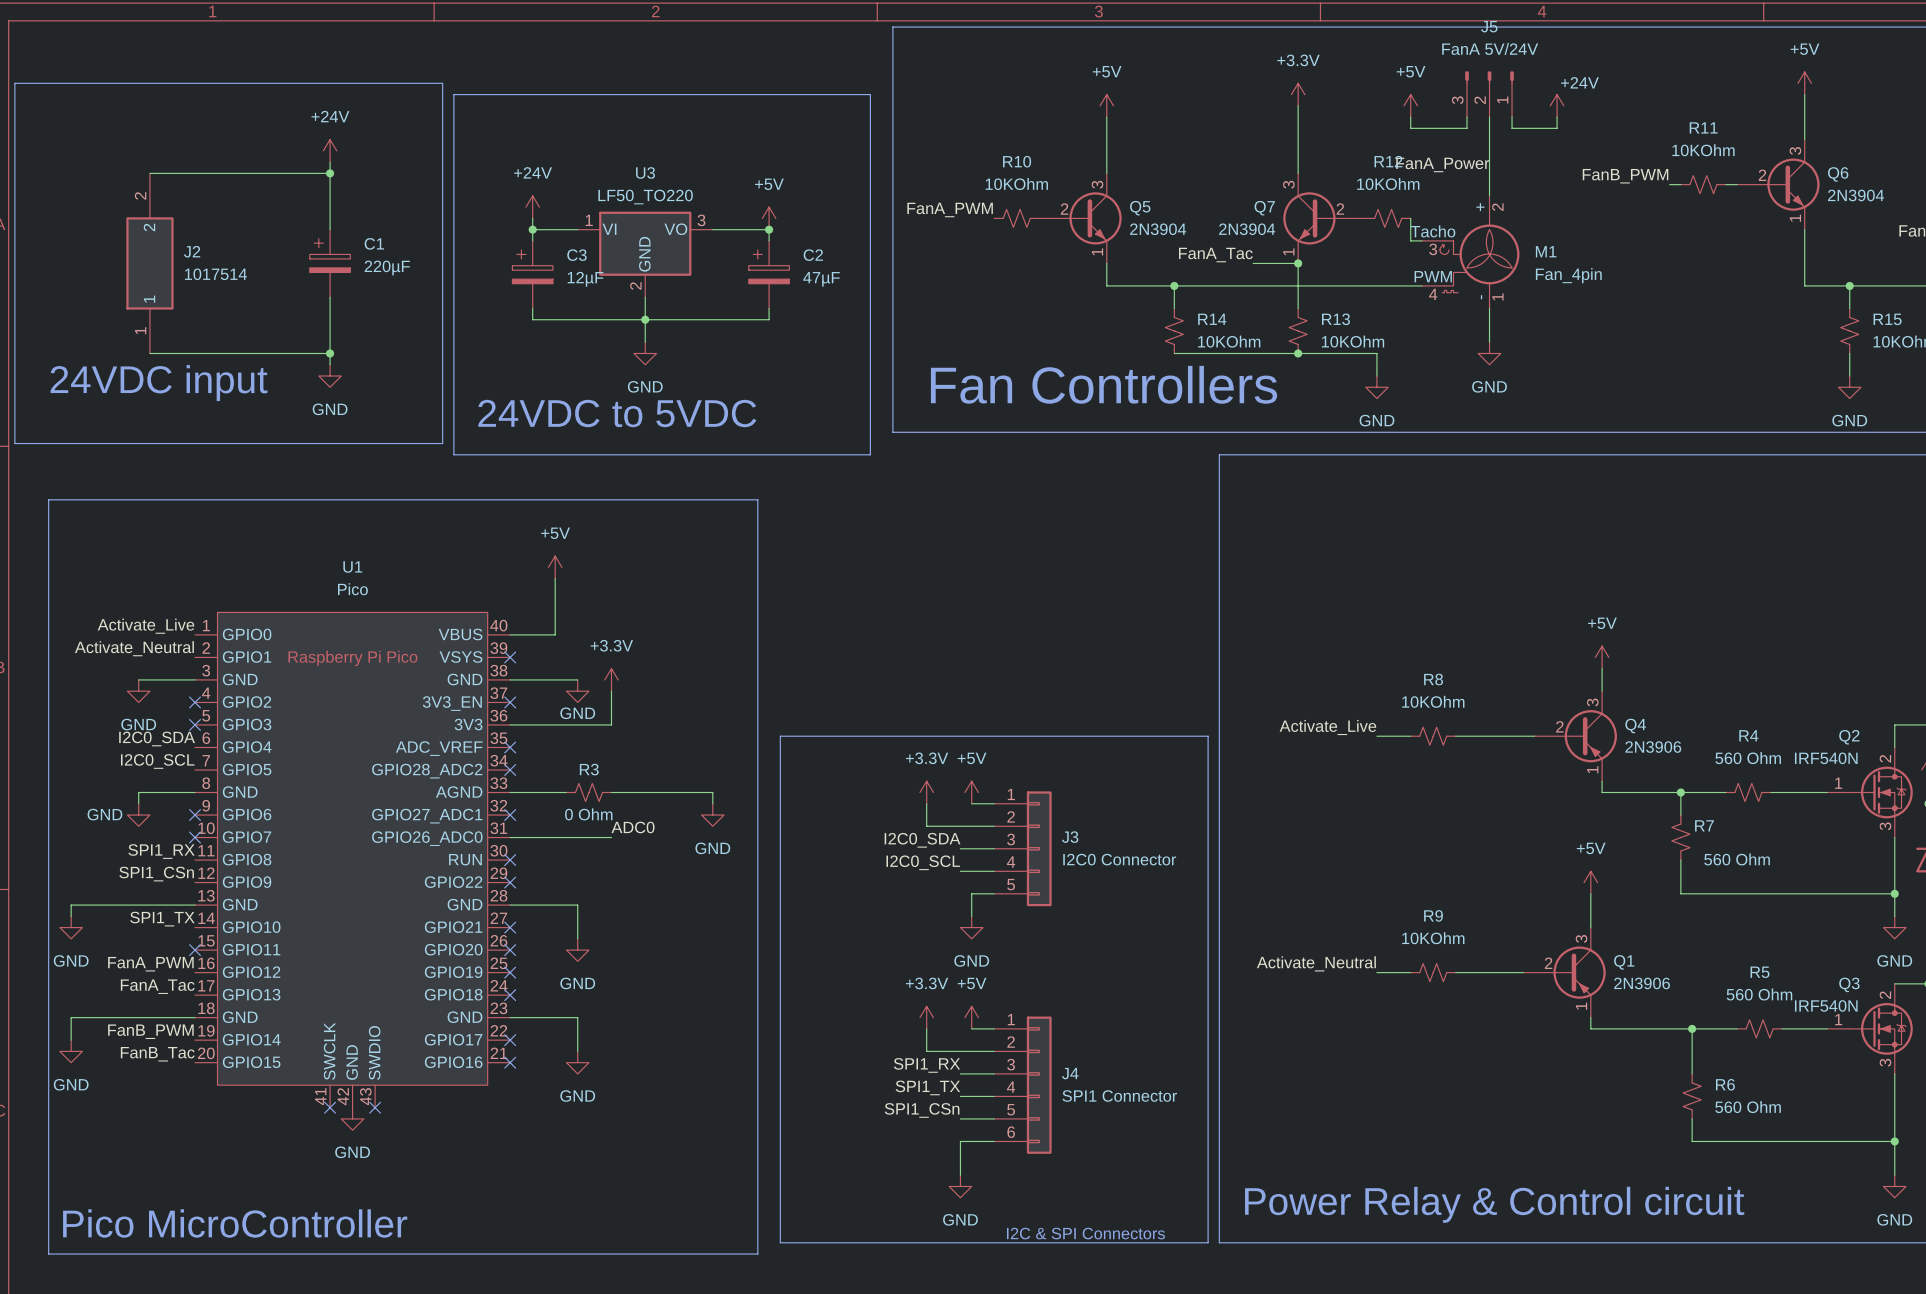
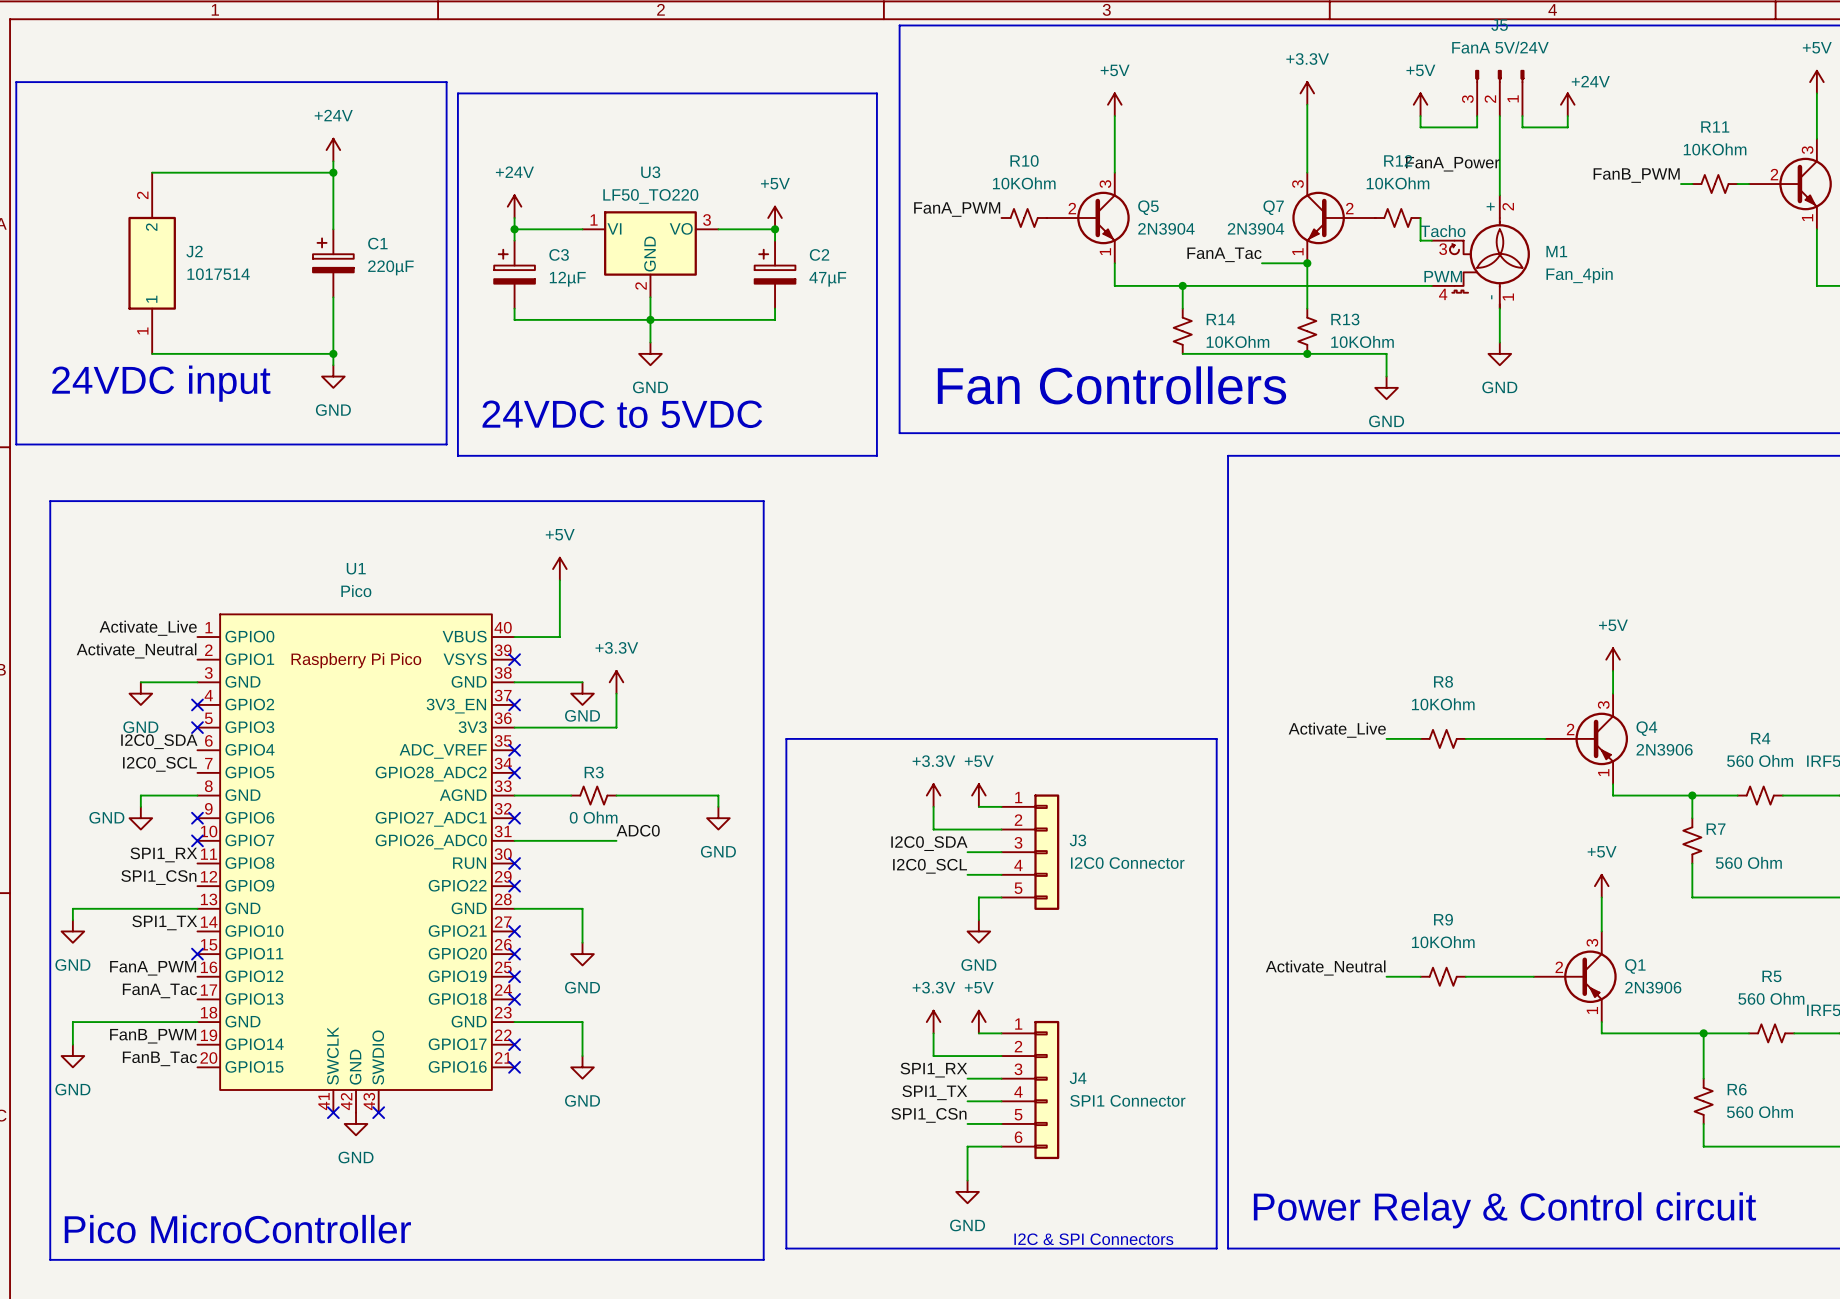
power symbol position: +24V (532, 207) -> +24V (514, 206)
wire: (532, 218) (532, 240) -> (514, 217) (514, 240)
wire: none -> (514, 229) (537, 229)
junction position: (532, 229) -> (514, 229)
C3 position: (532, 274) -> (514, 274)
wire: (532, 308) (532, 319) -> (514, 308) (514, 319) (537, 319)

